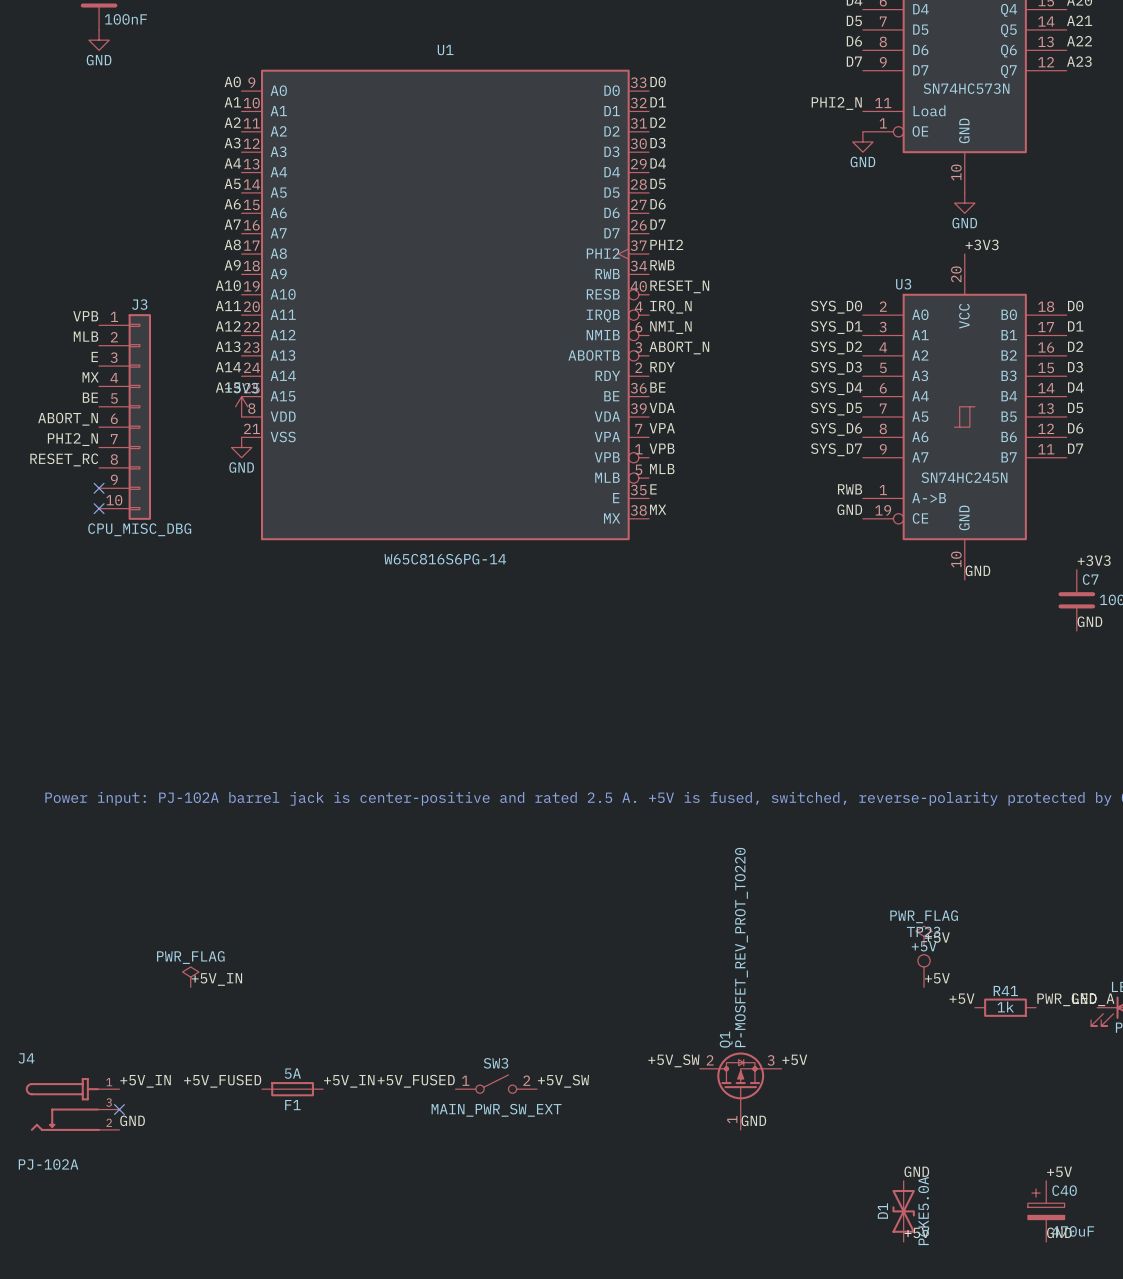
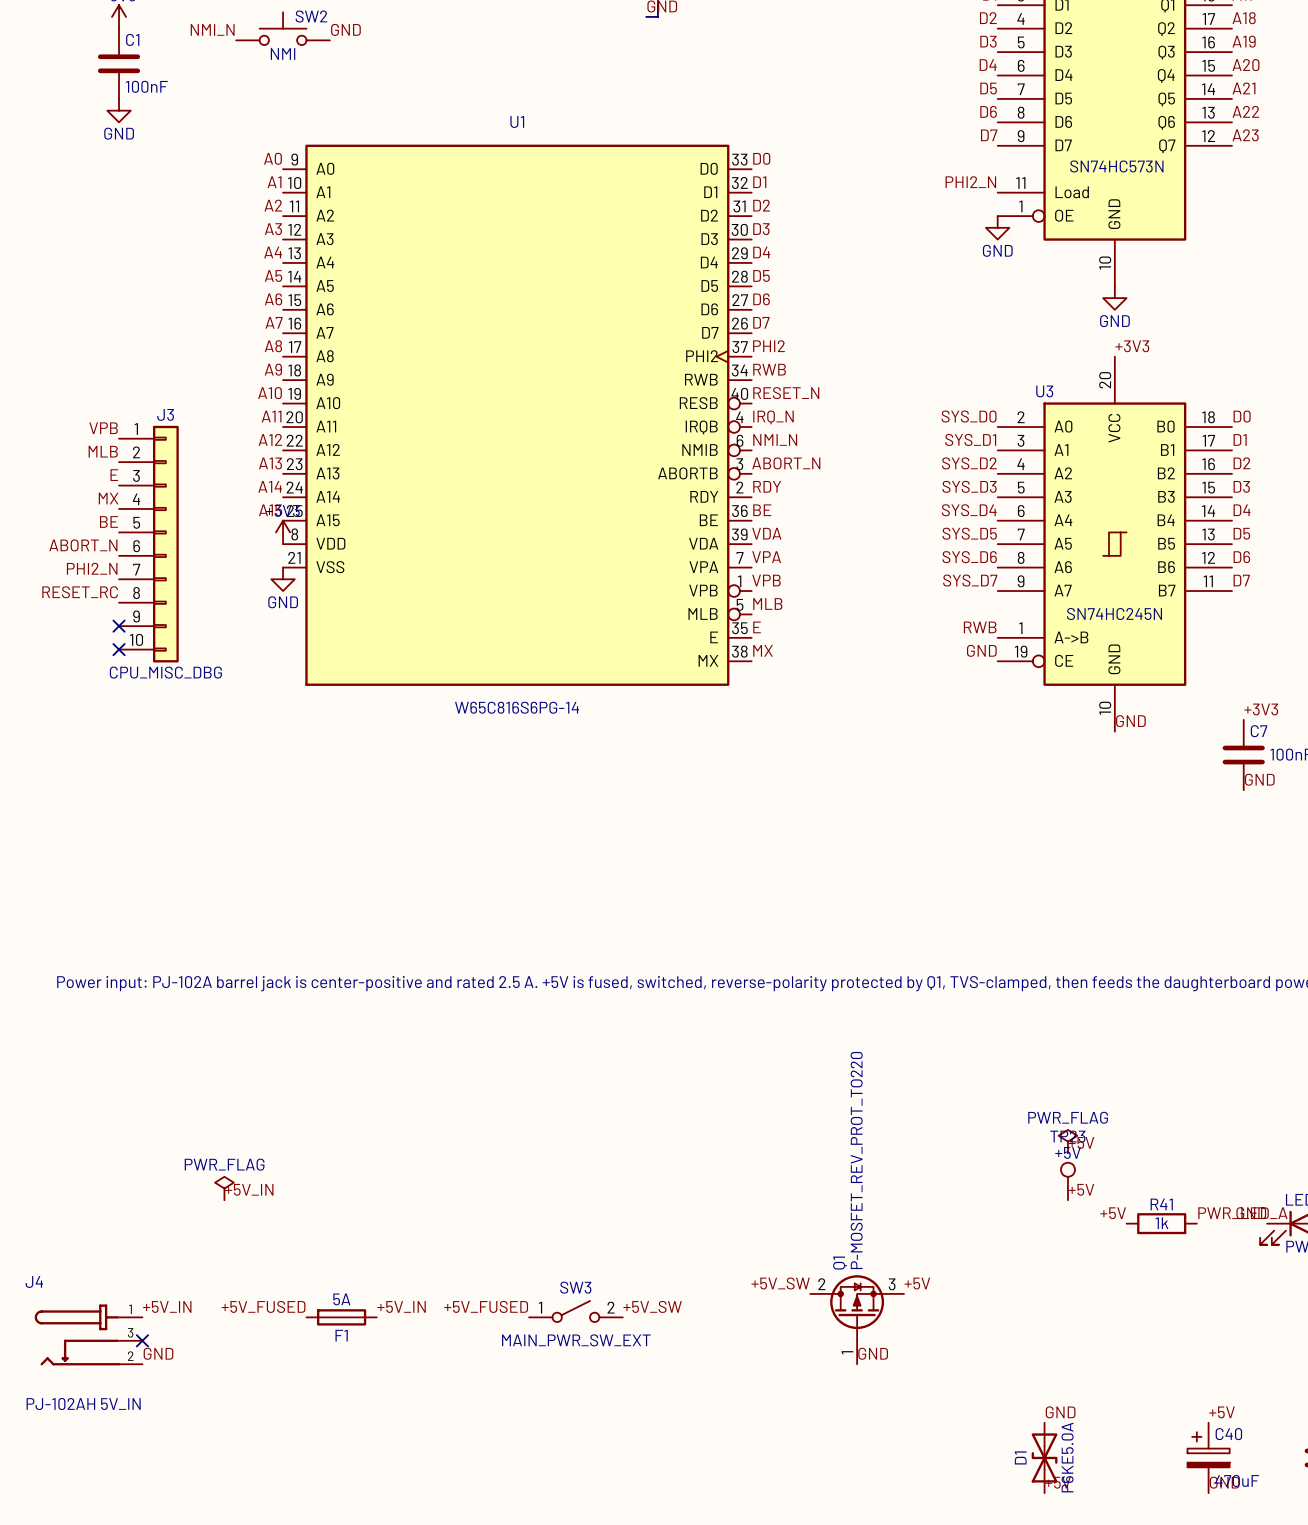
J4 value: PJ-102A (48, 1164) -> PJ-102AH 5V_IN (83, 1404)

